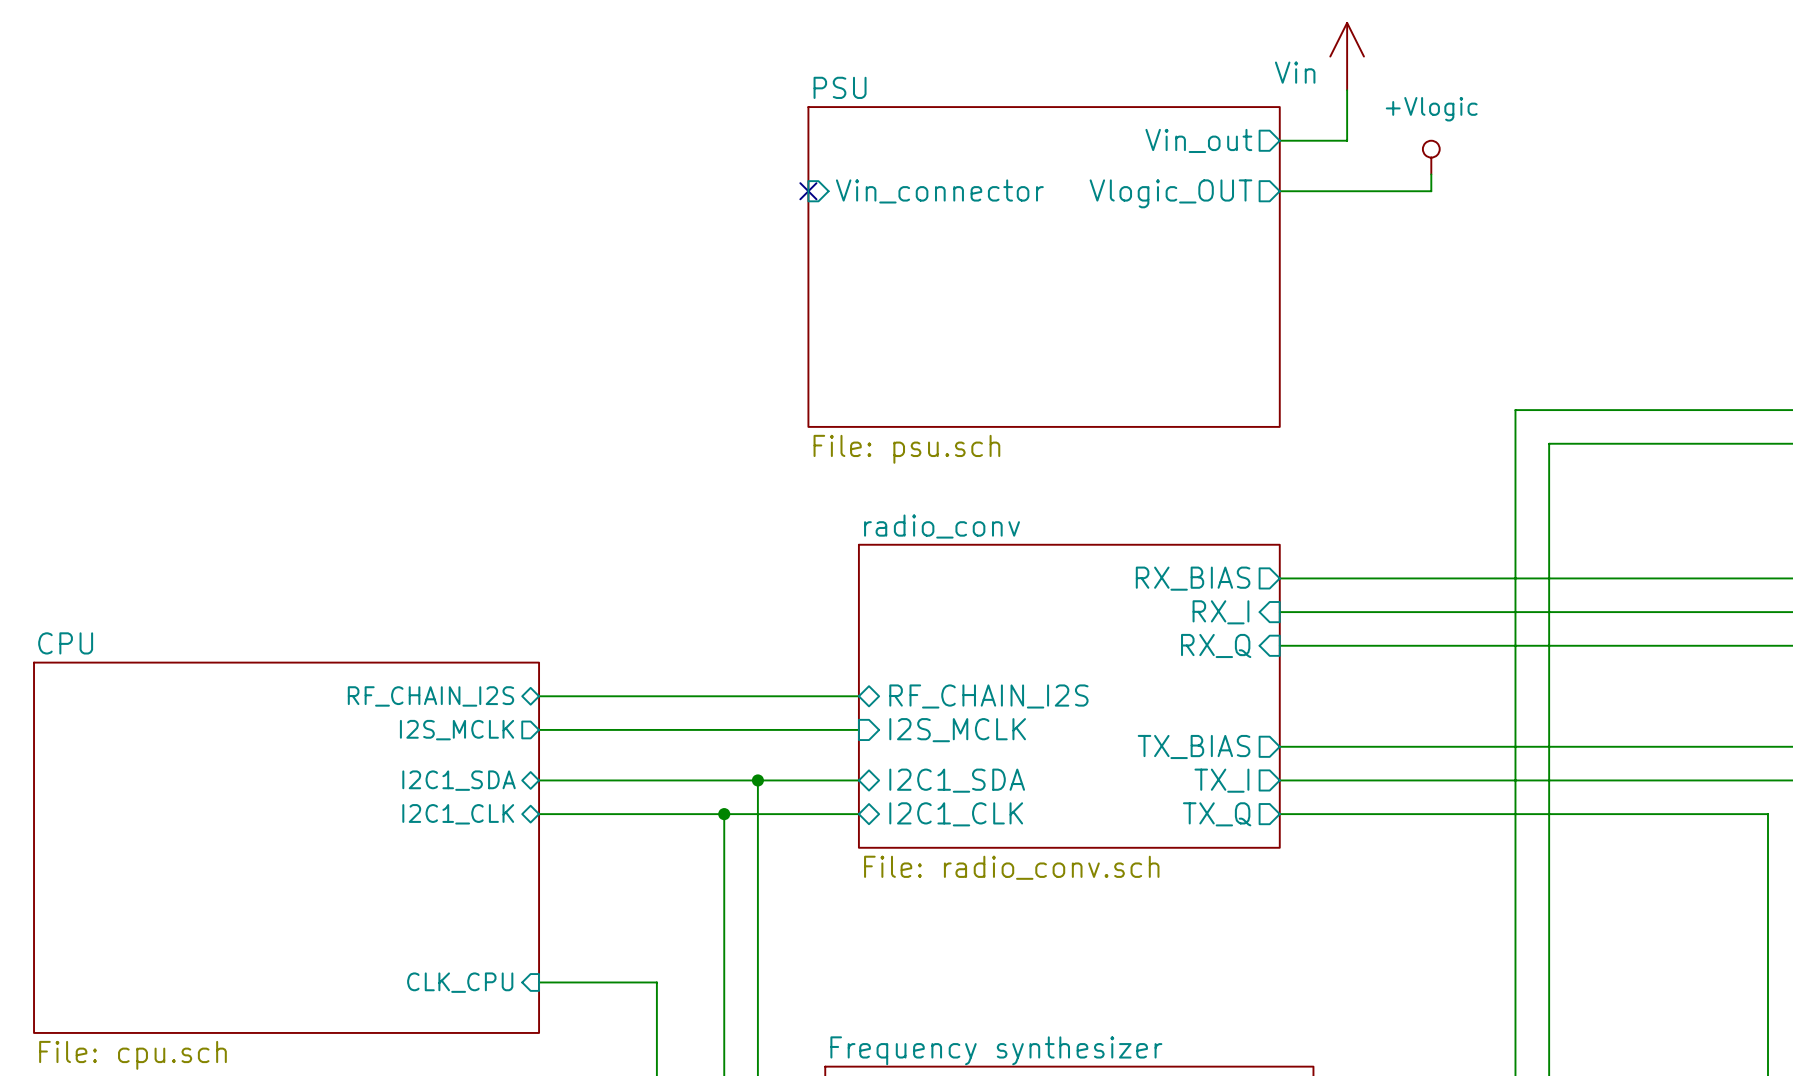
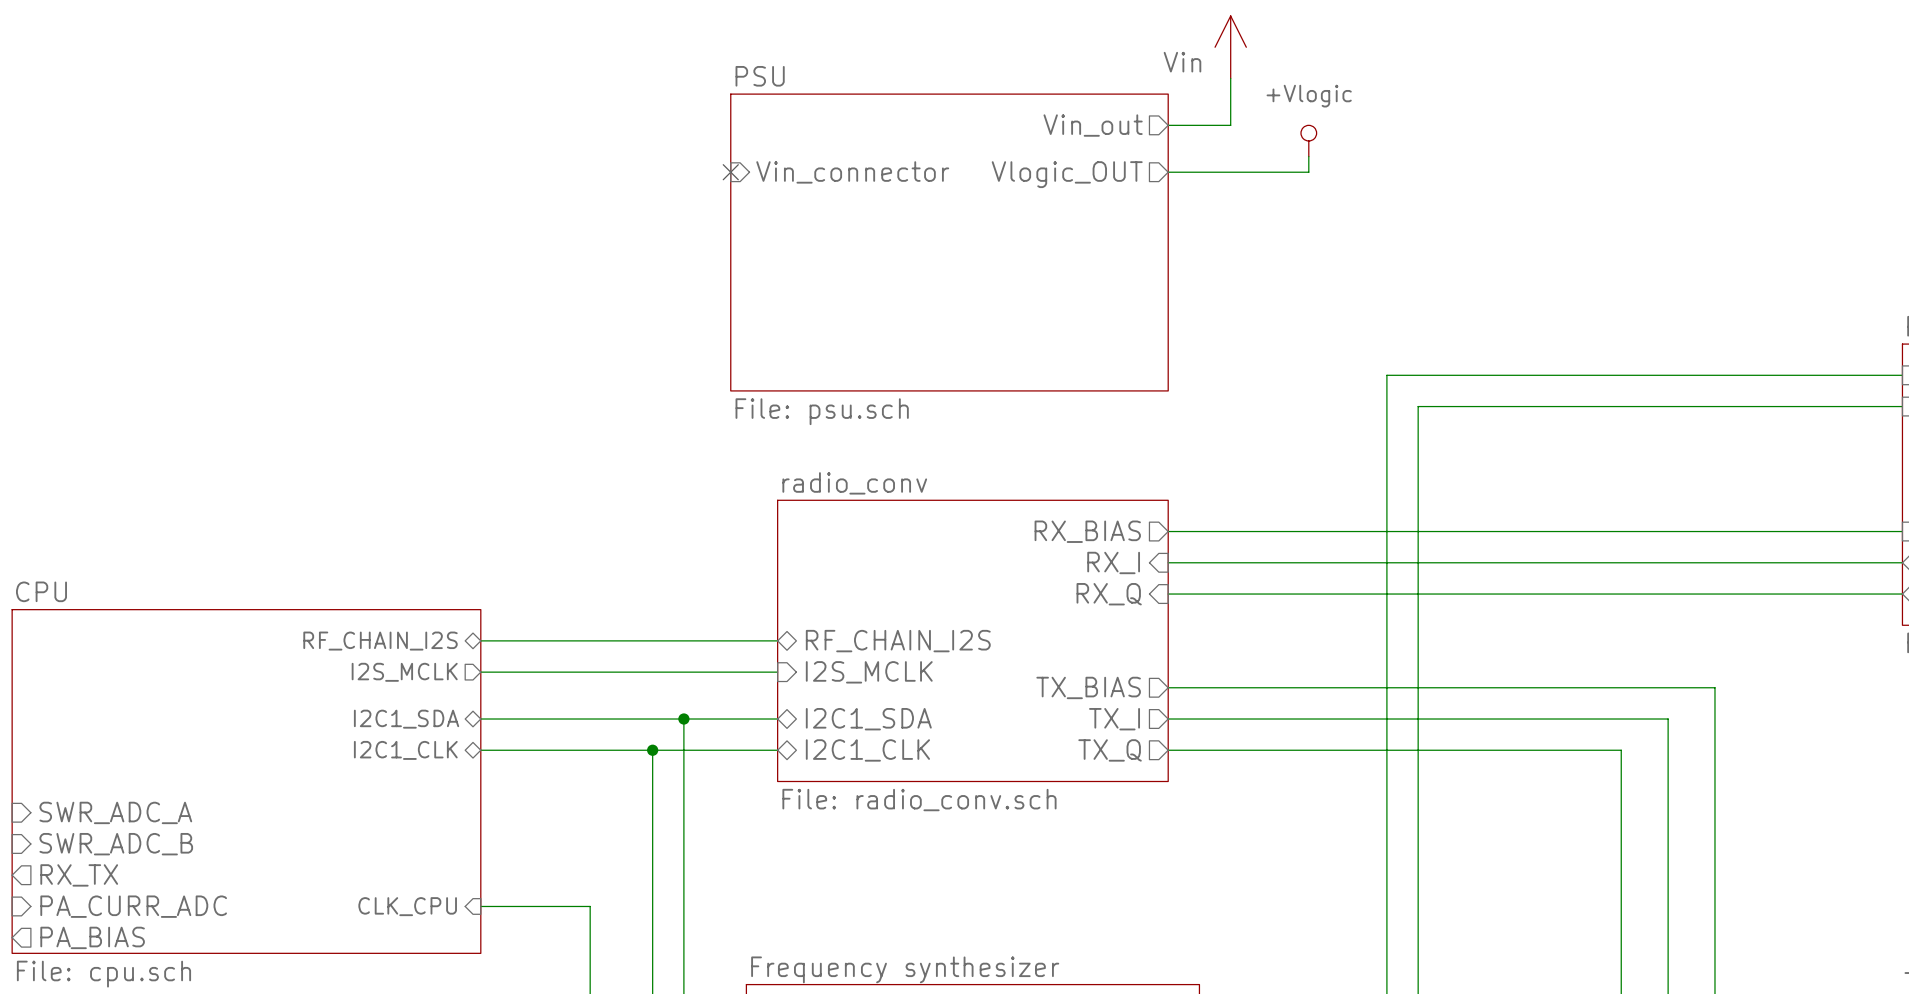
sheet pin: none -> SWR_ADC_A (115, 812)
sheet pin: none -> SWR_ADC_B (116, 844)
sheet pin: none -> RX_TX (79, 875)
sheet pin: none -> PA_CURR_ADC (133, 906)
sheet pin: none -> PA_BIAS (92, 937)

